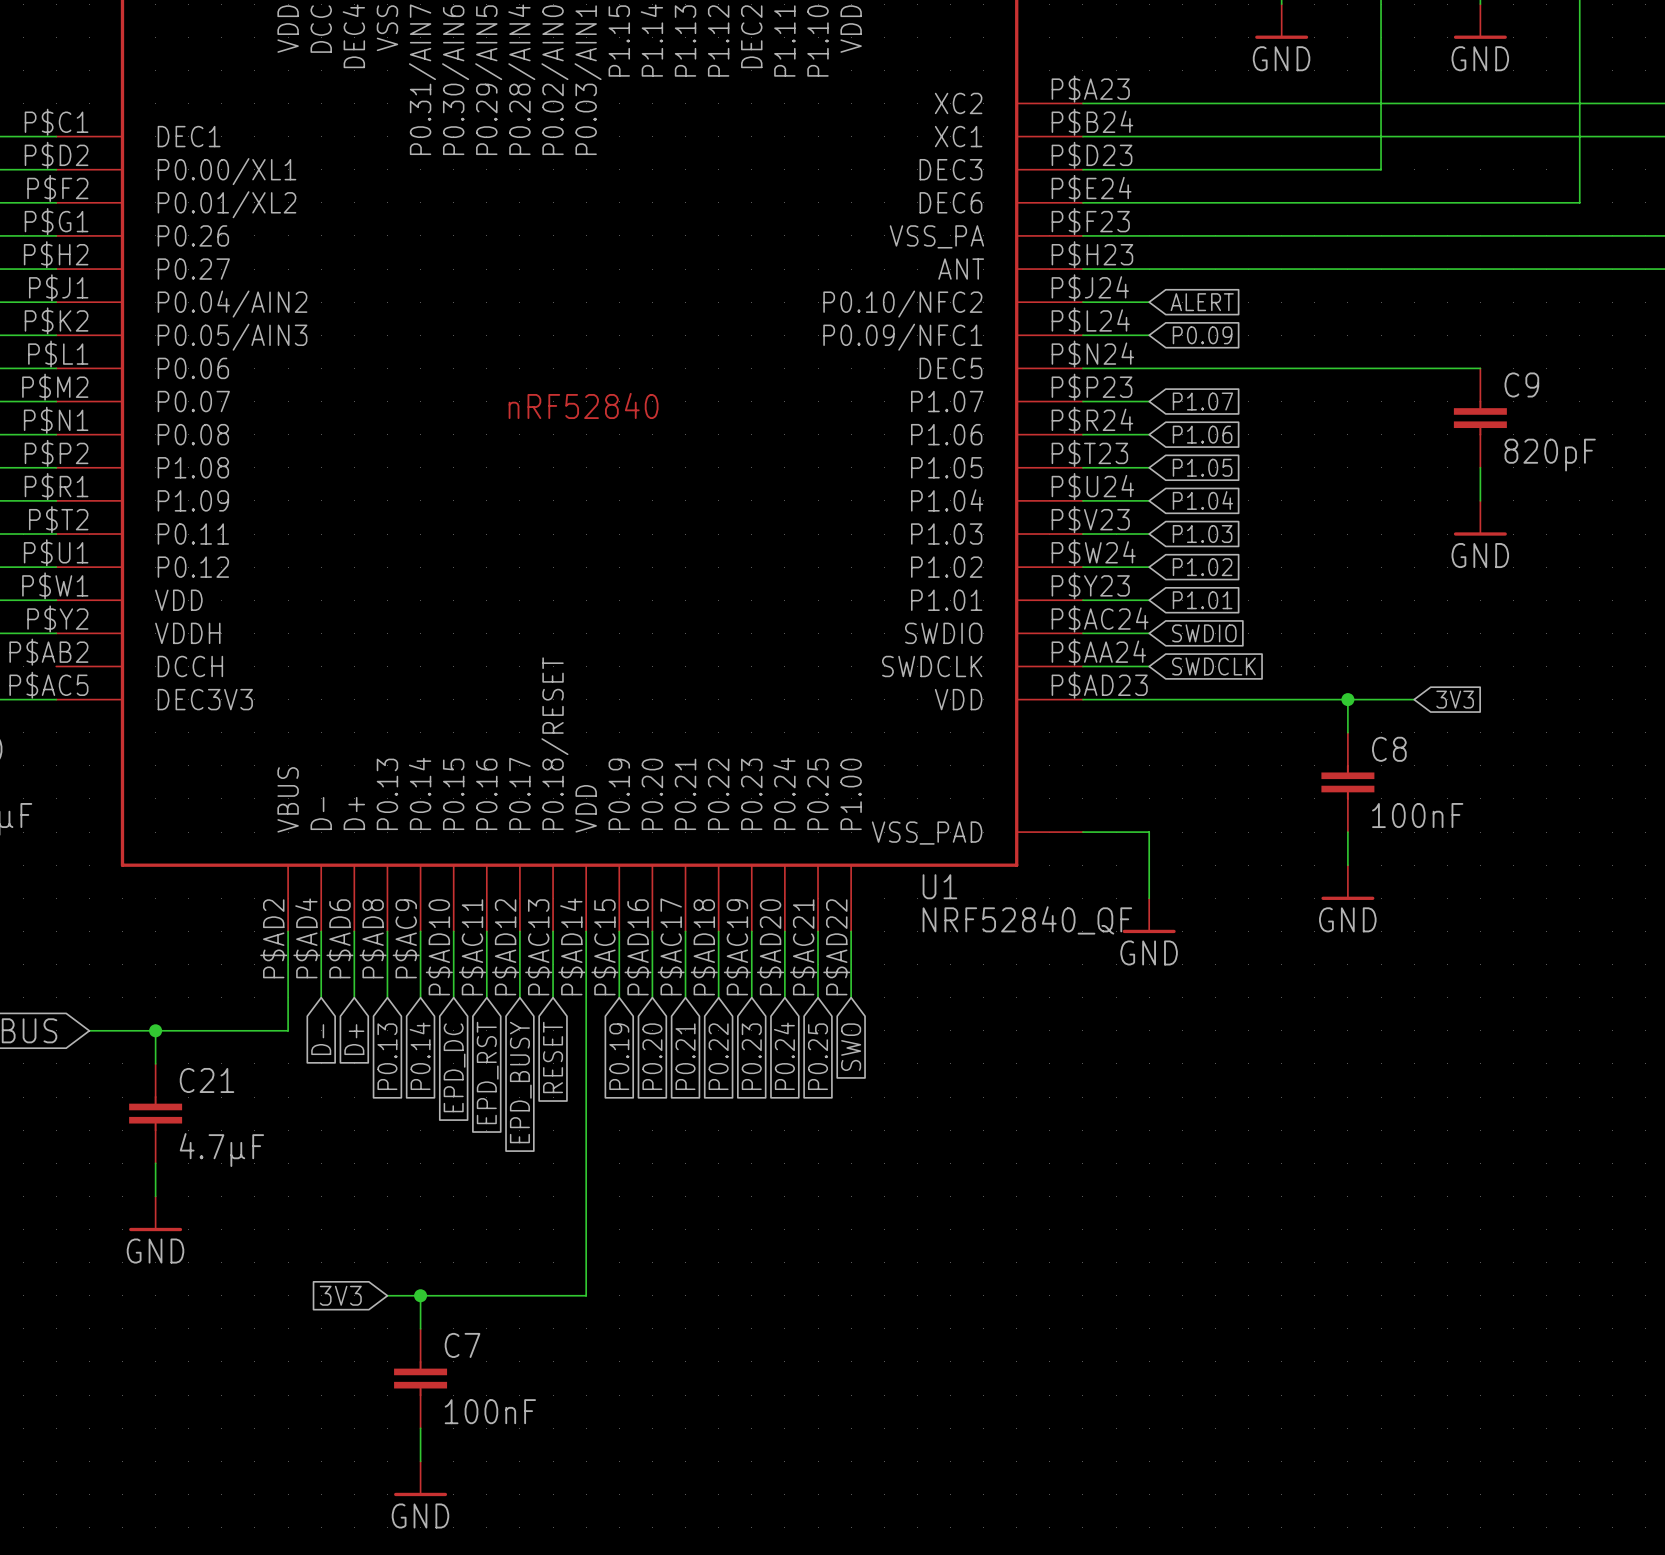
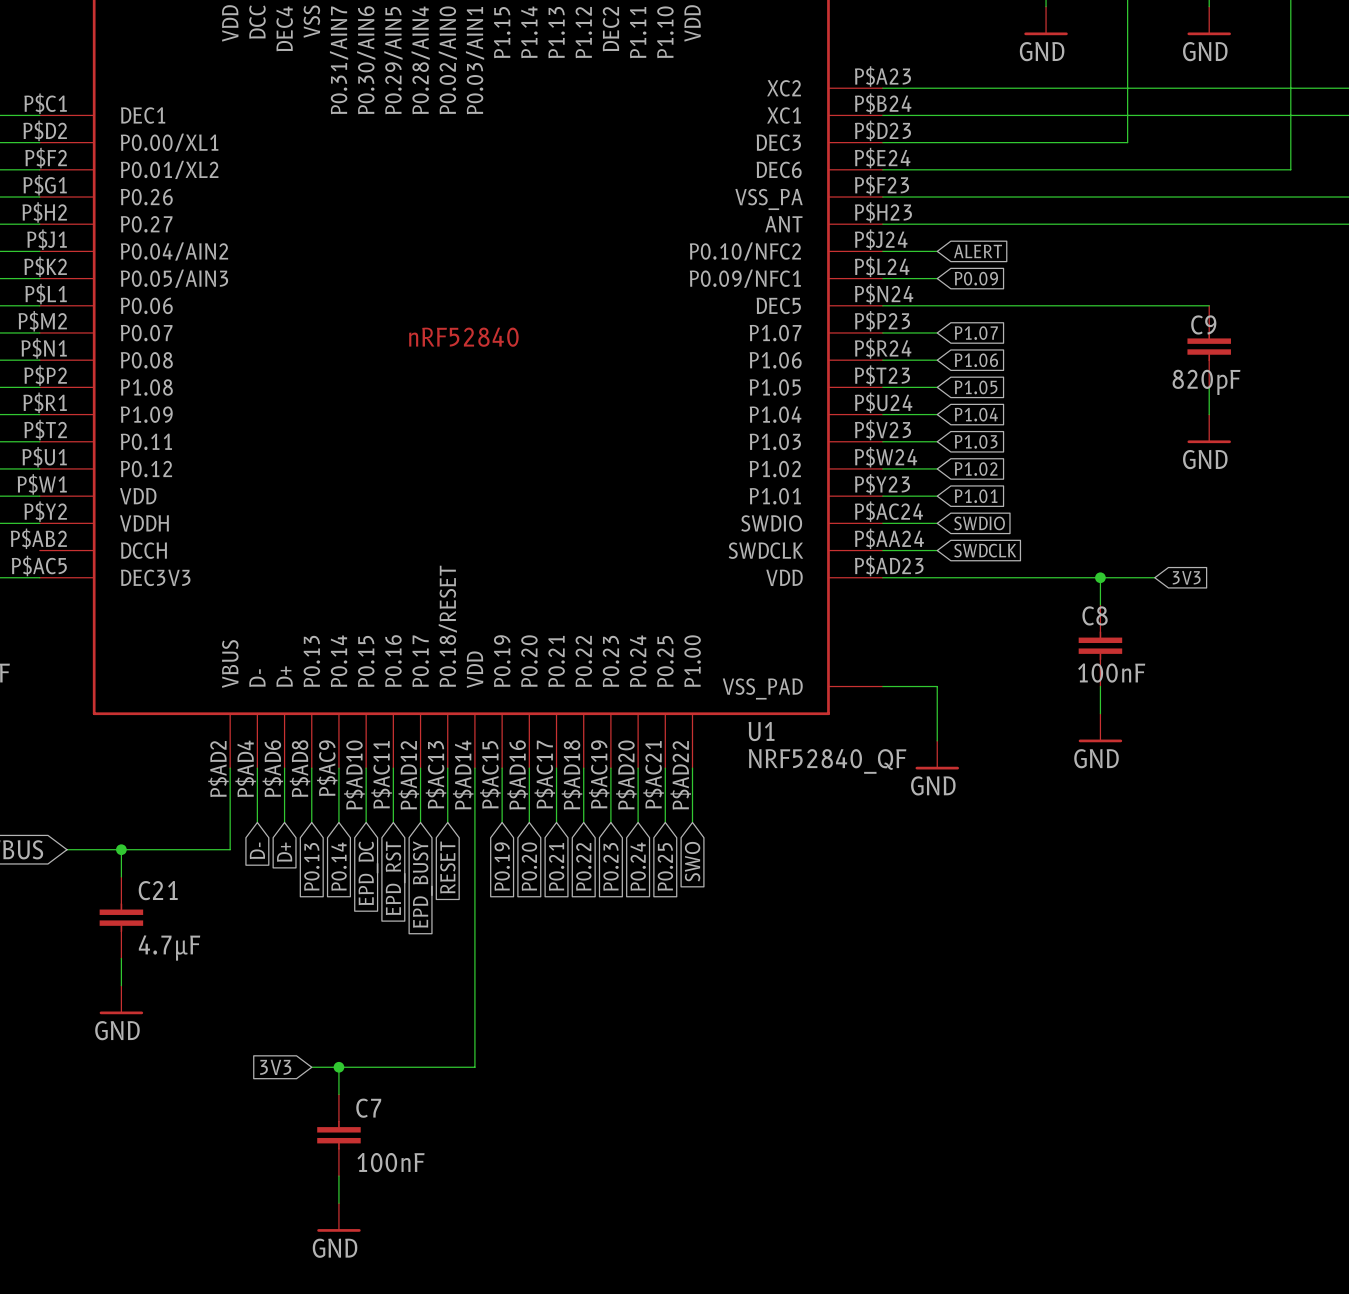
C9 name position: C9 (1521, 384) -> C9 (1203, 324)
C9 value position: 820pF (1550, 455) -> 820pF (1206, 382)
C8 name position: C8 (1389, 749) -> C8 (1095, 615)
C8 value position: 100nF (1417, 815) -> 100nF (1111, 673)

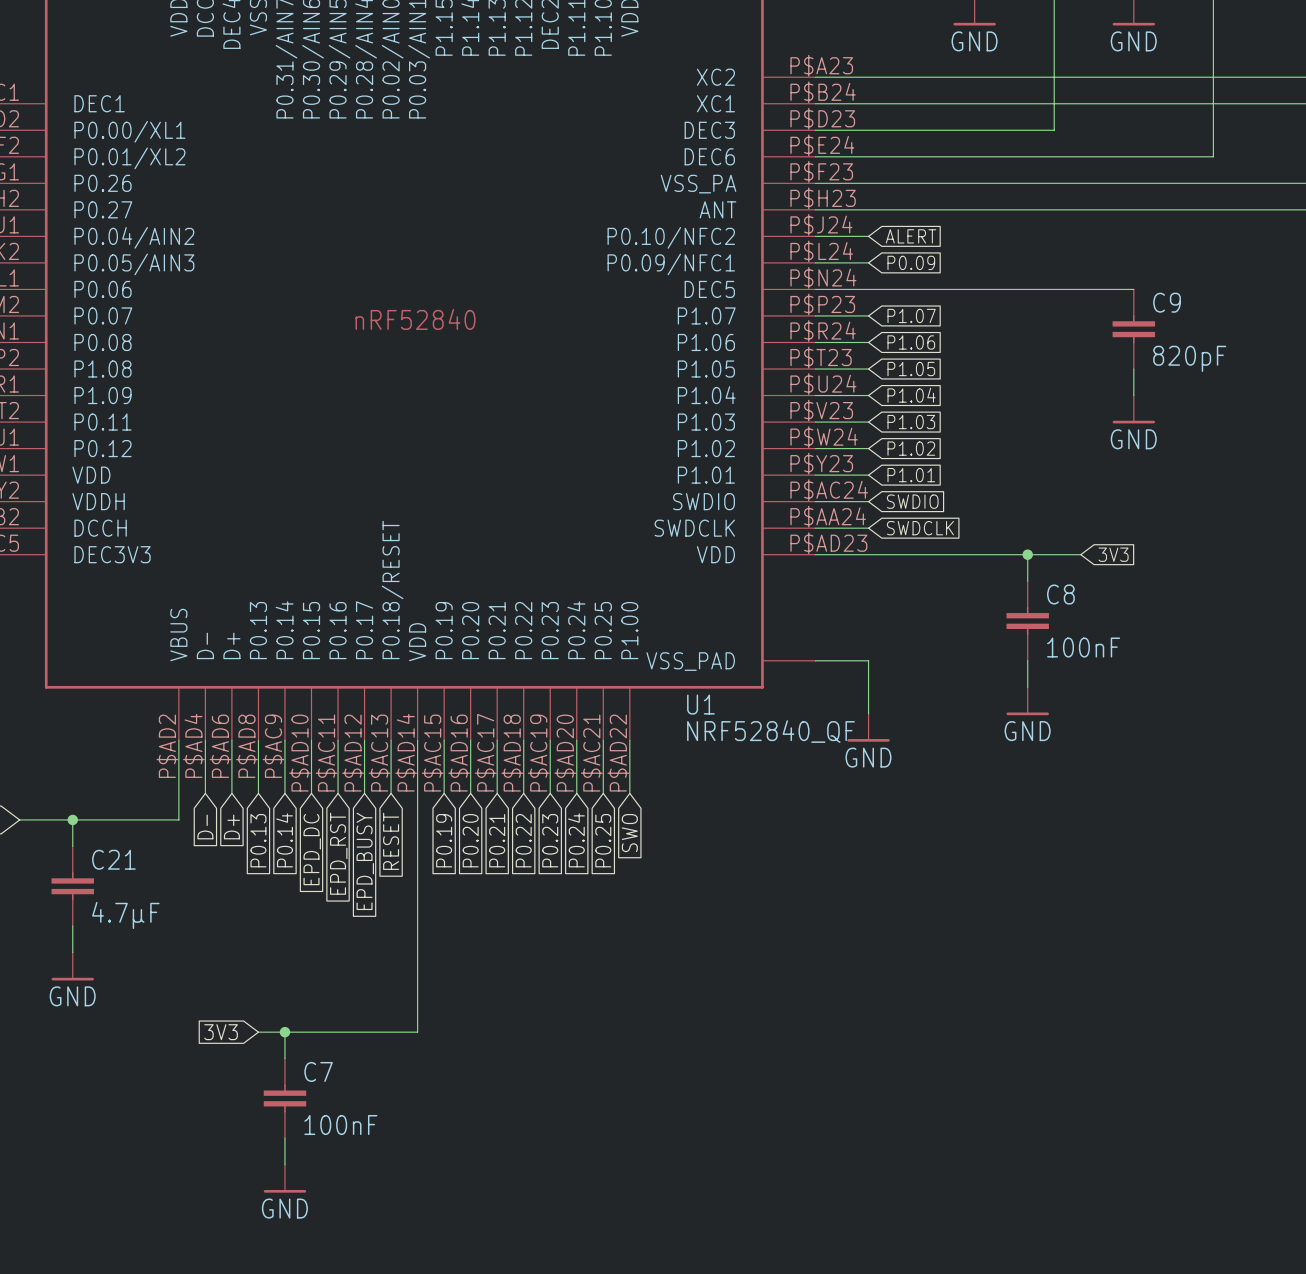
C9 name position: C9 (1203, 324) -> C9 (1167, 302)
C9 value position: 820pF (1206, 382) -> 820pF (1189, 358)
C8 name position: C8 (1095, 615) -> C8 (1060, 594)
C8 value position: 100nF (1111, 673) -> 100nF (1083, 647)

